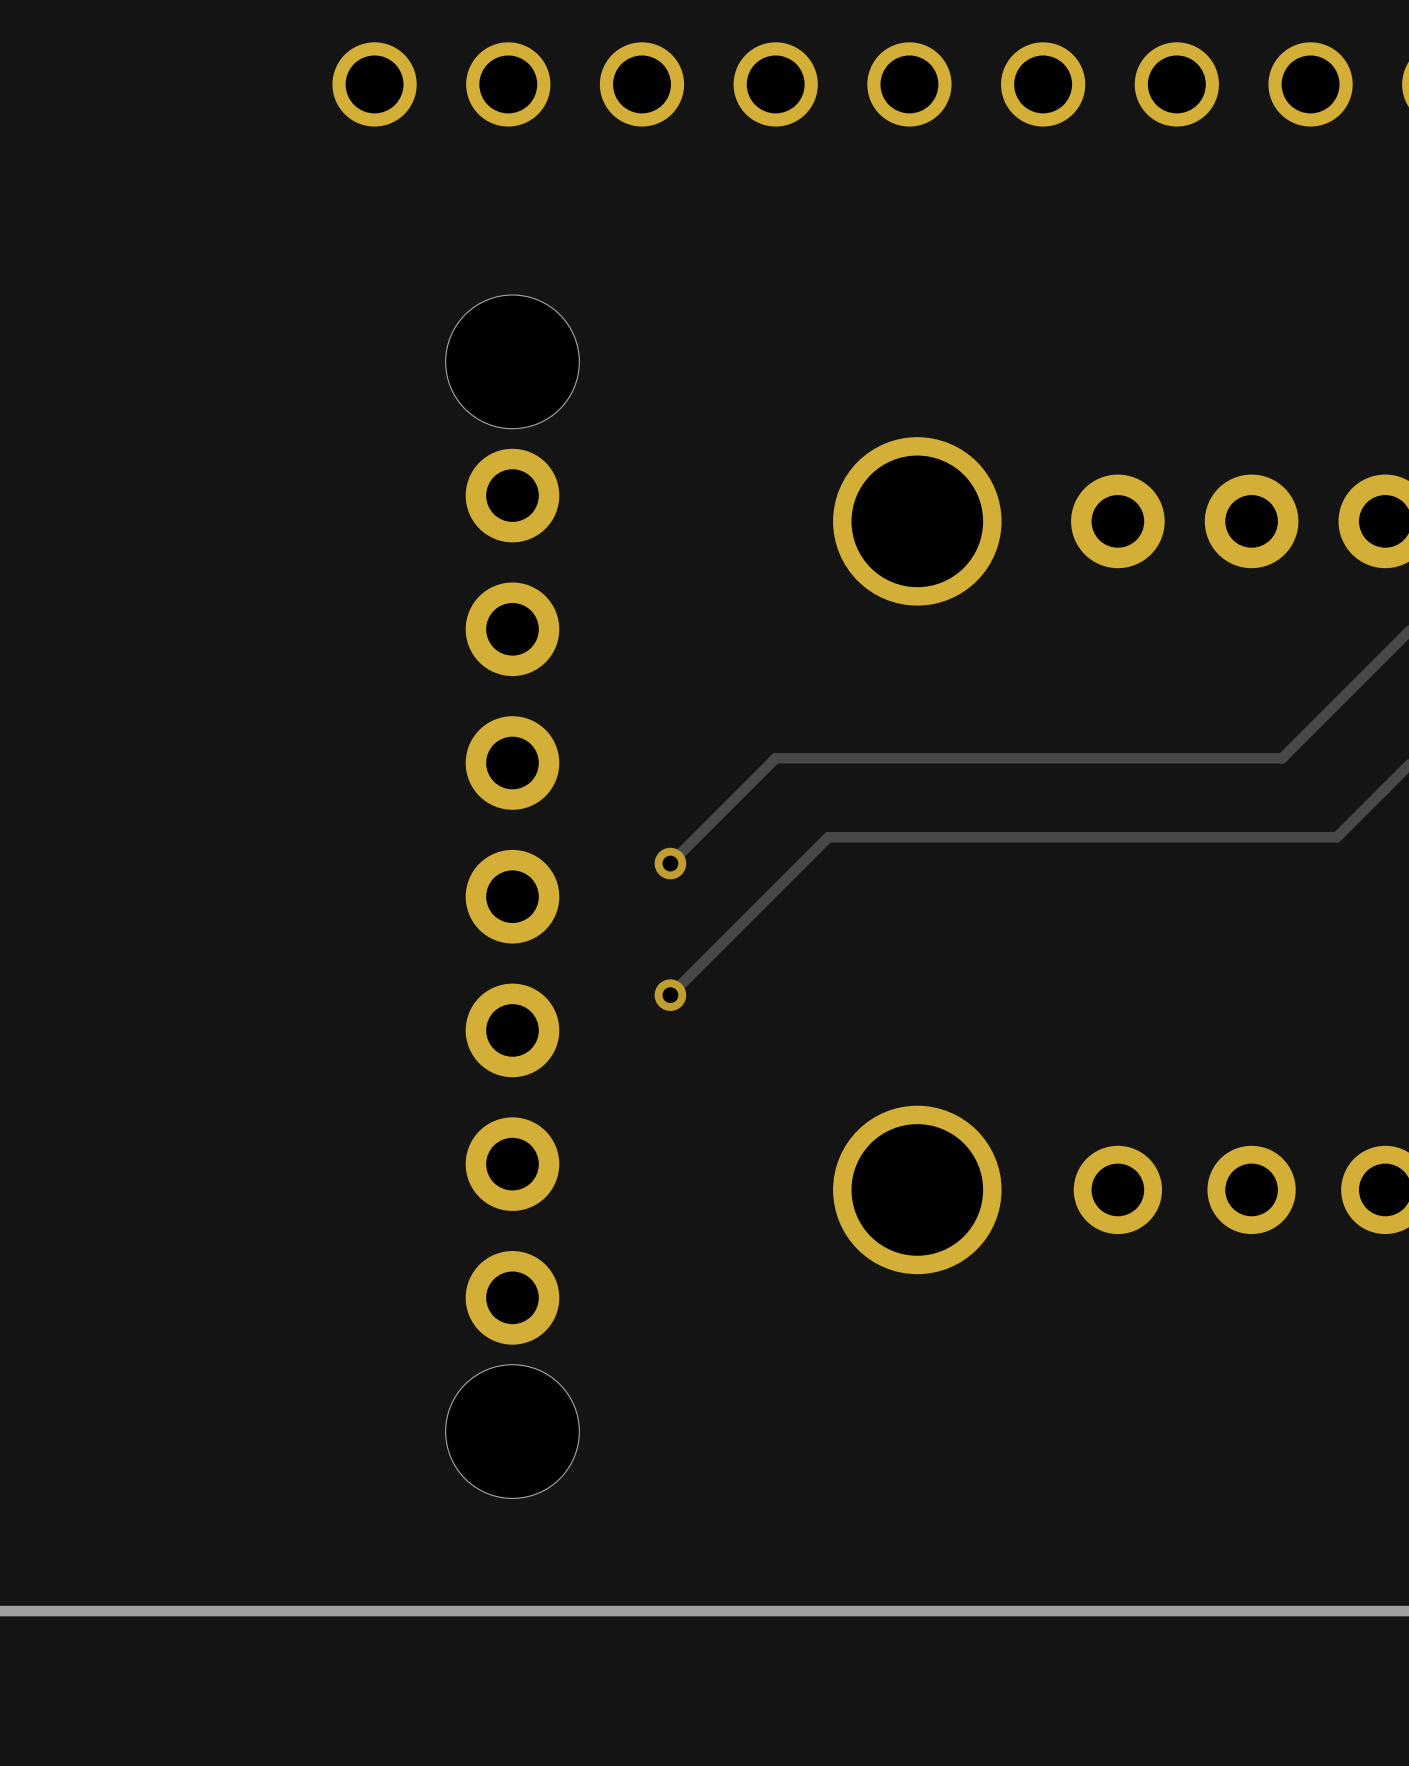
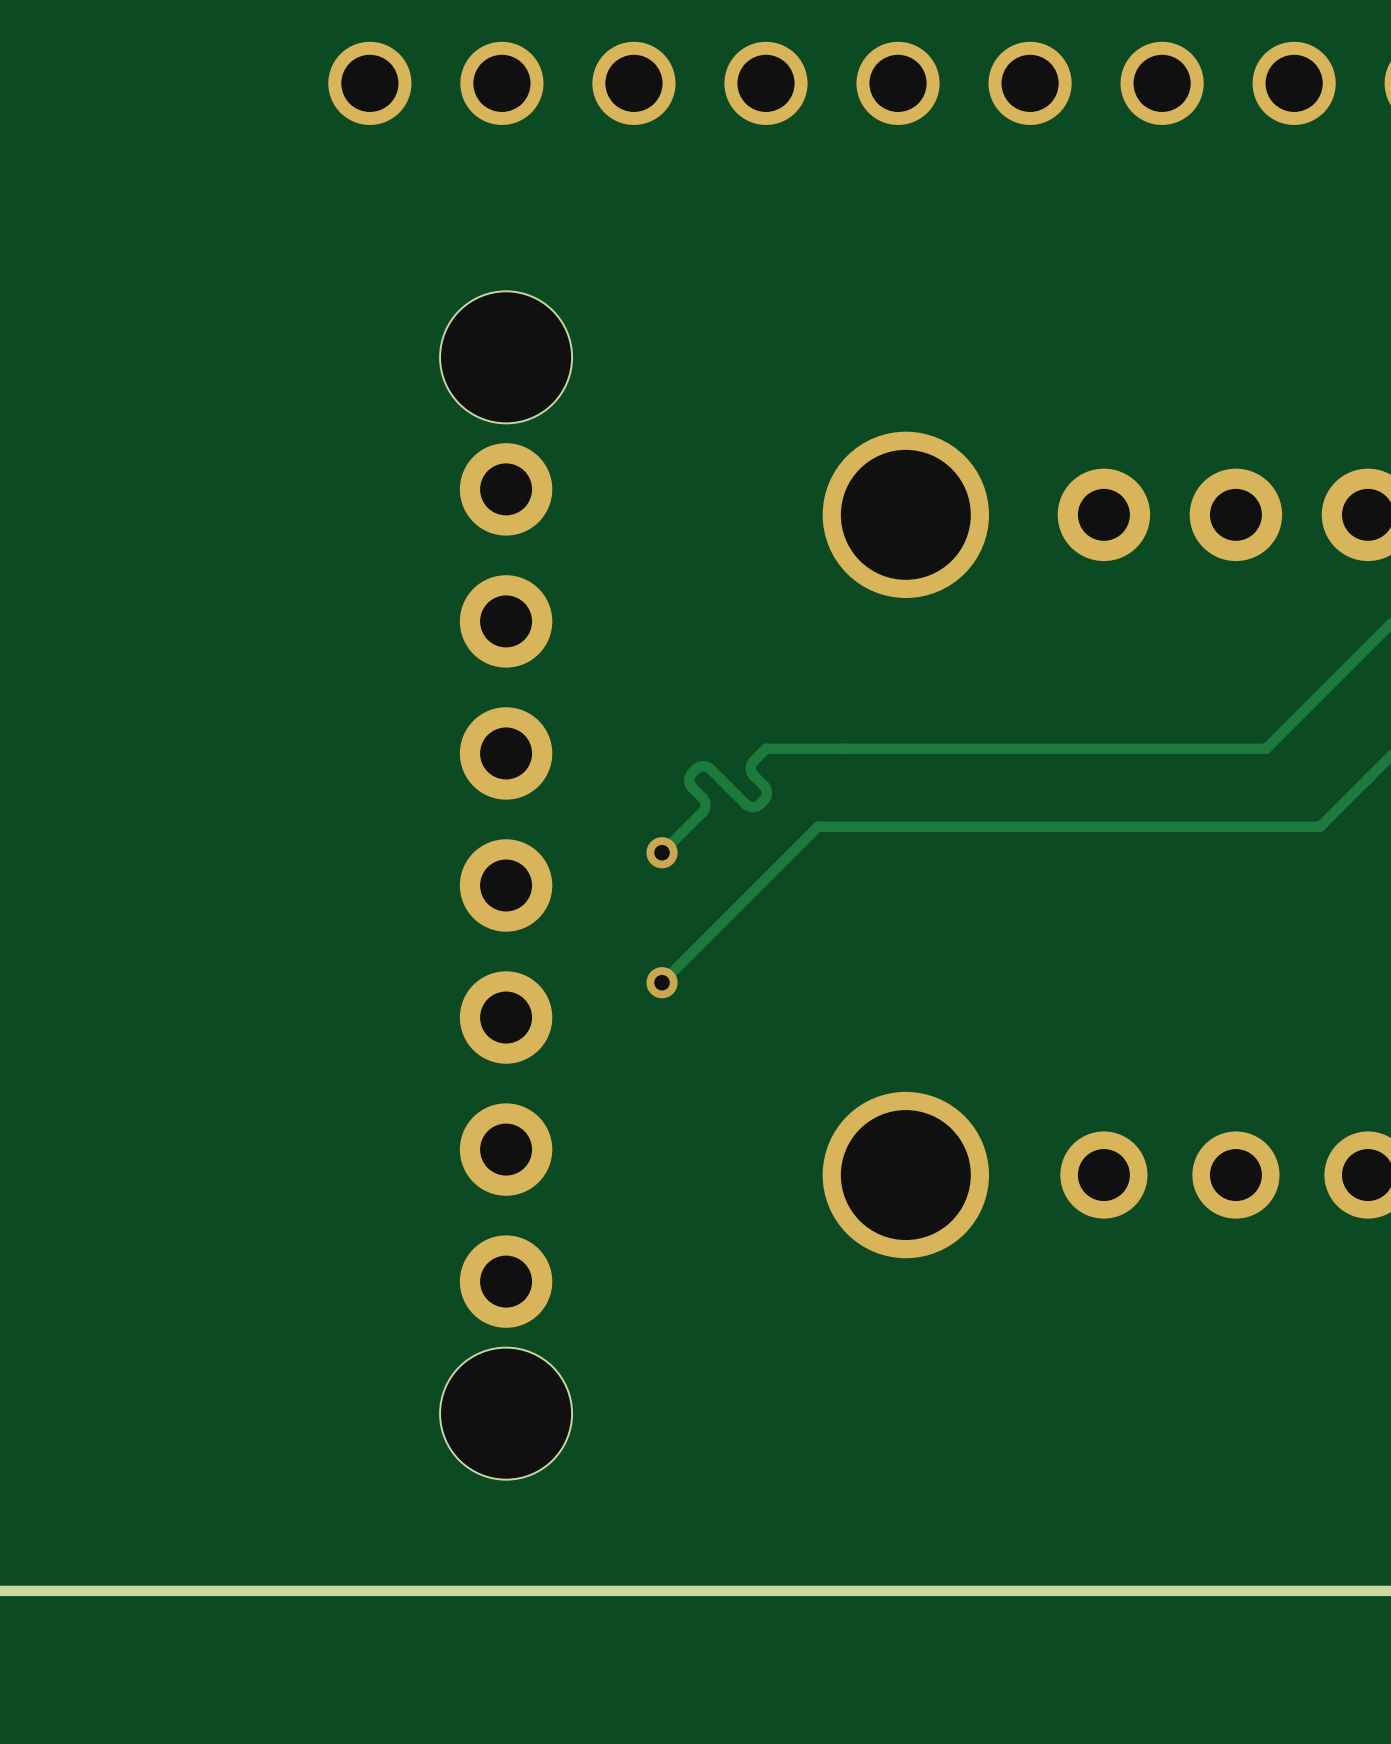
track: (763, 770) (711, 822) -> (753, 760) (750, 767) (751, 772) (764, 786) (766, 791) (765, 797) (760, 804) (753, 807) (747, 805) (709, 768) (702, 766) (692, 772) (689, 780) (691, 786) (704, 801) (705, 807) (702, 812)

